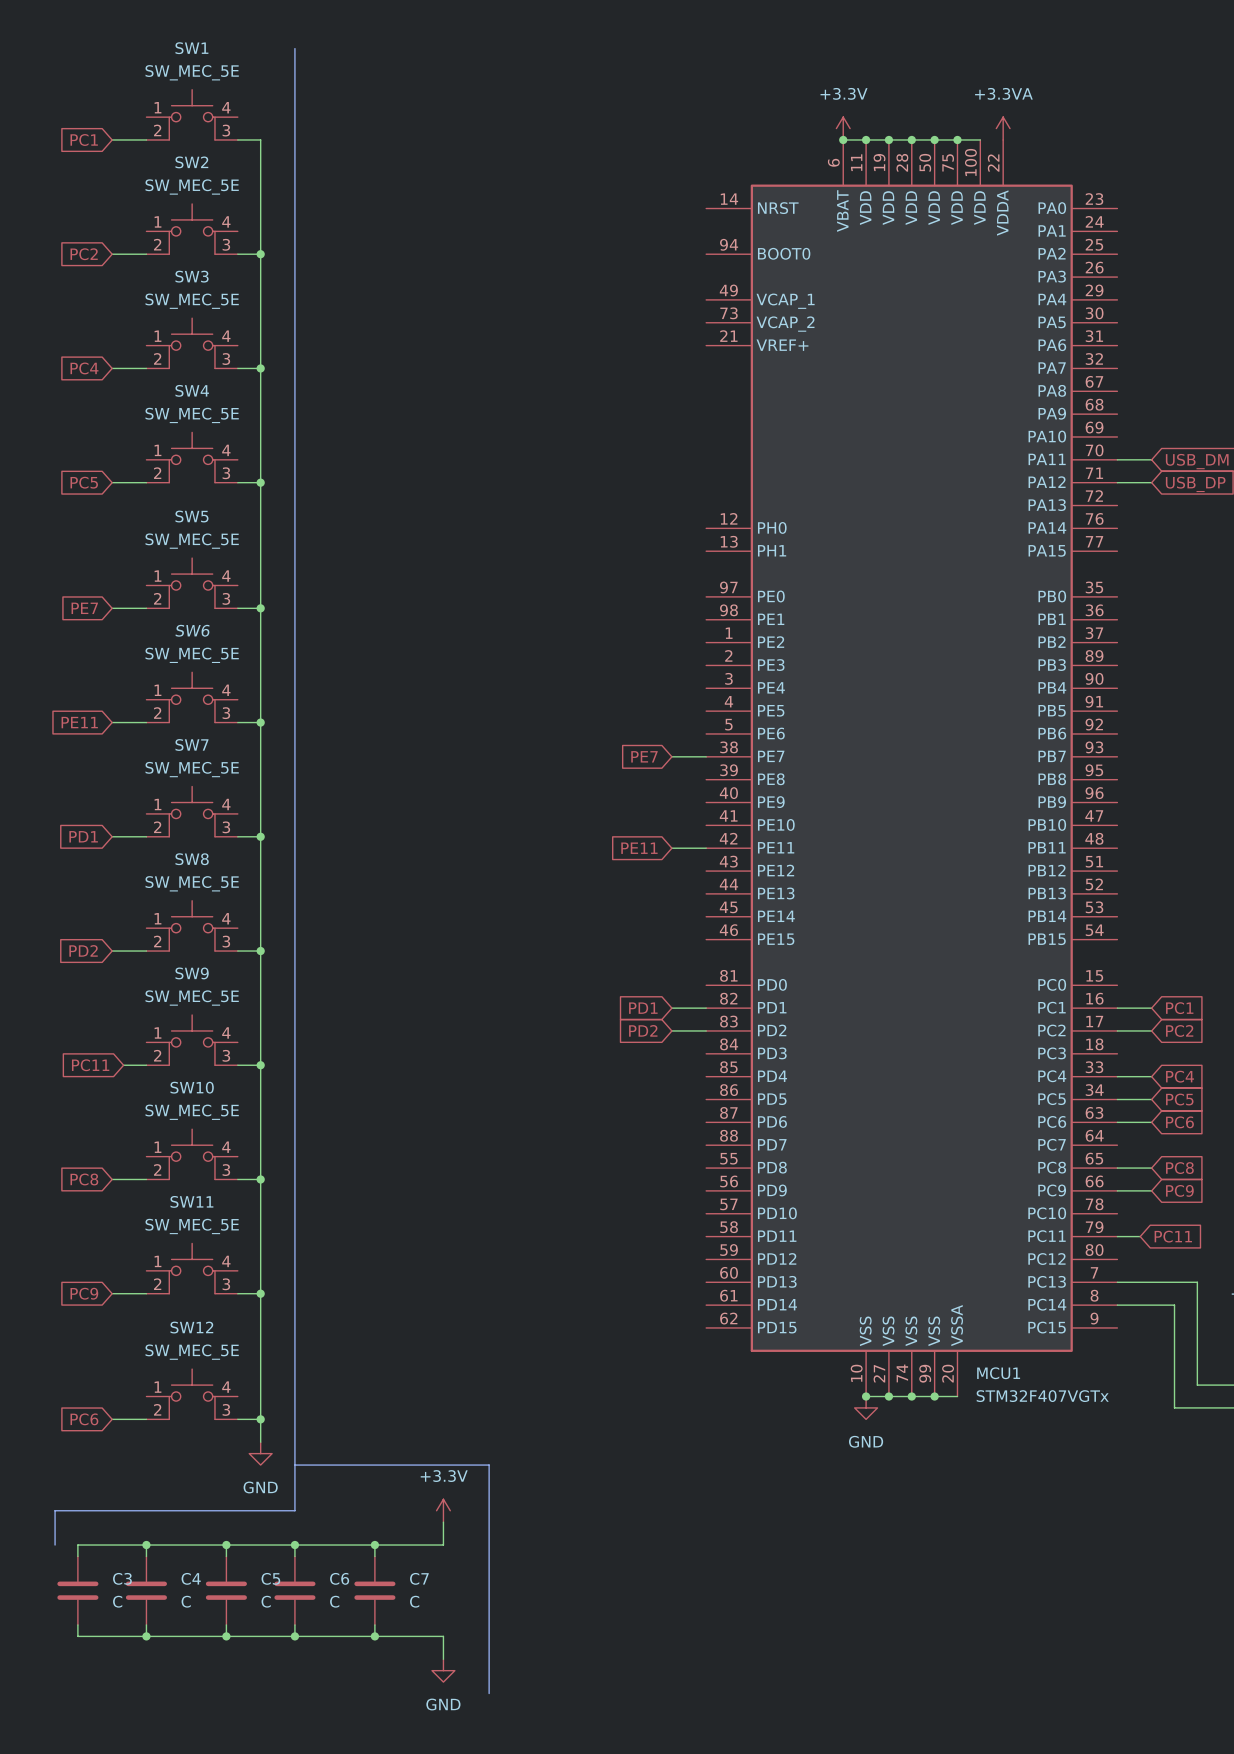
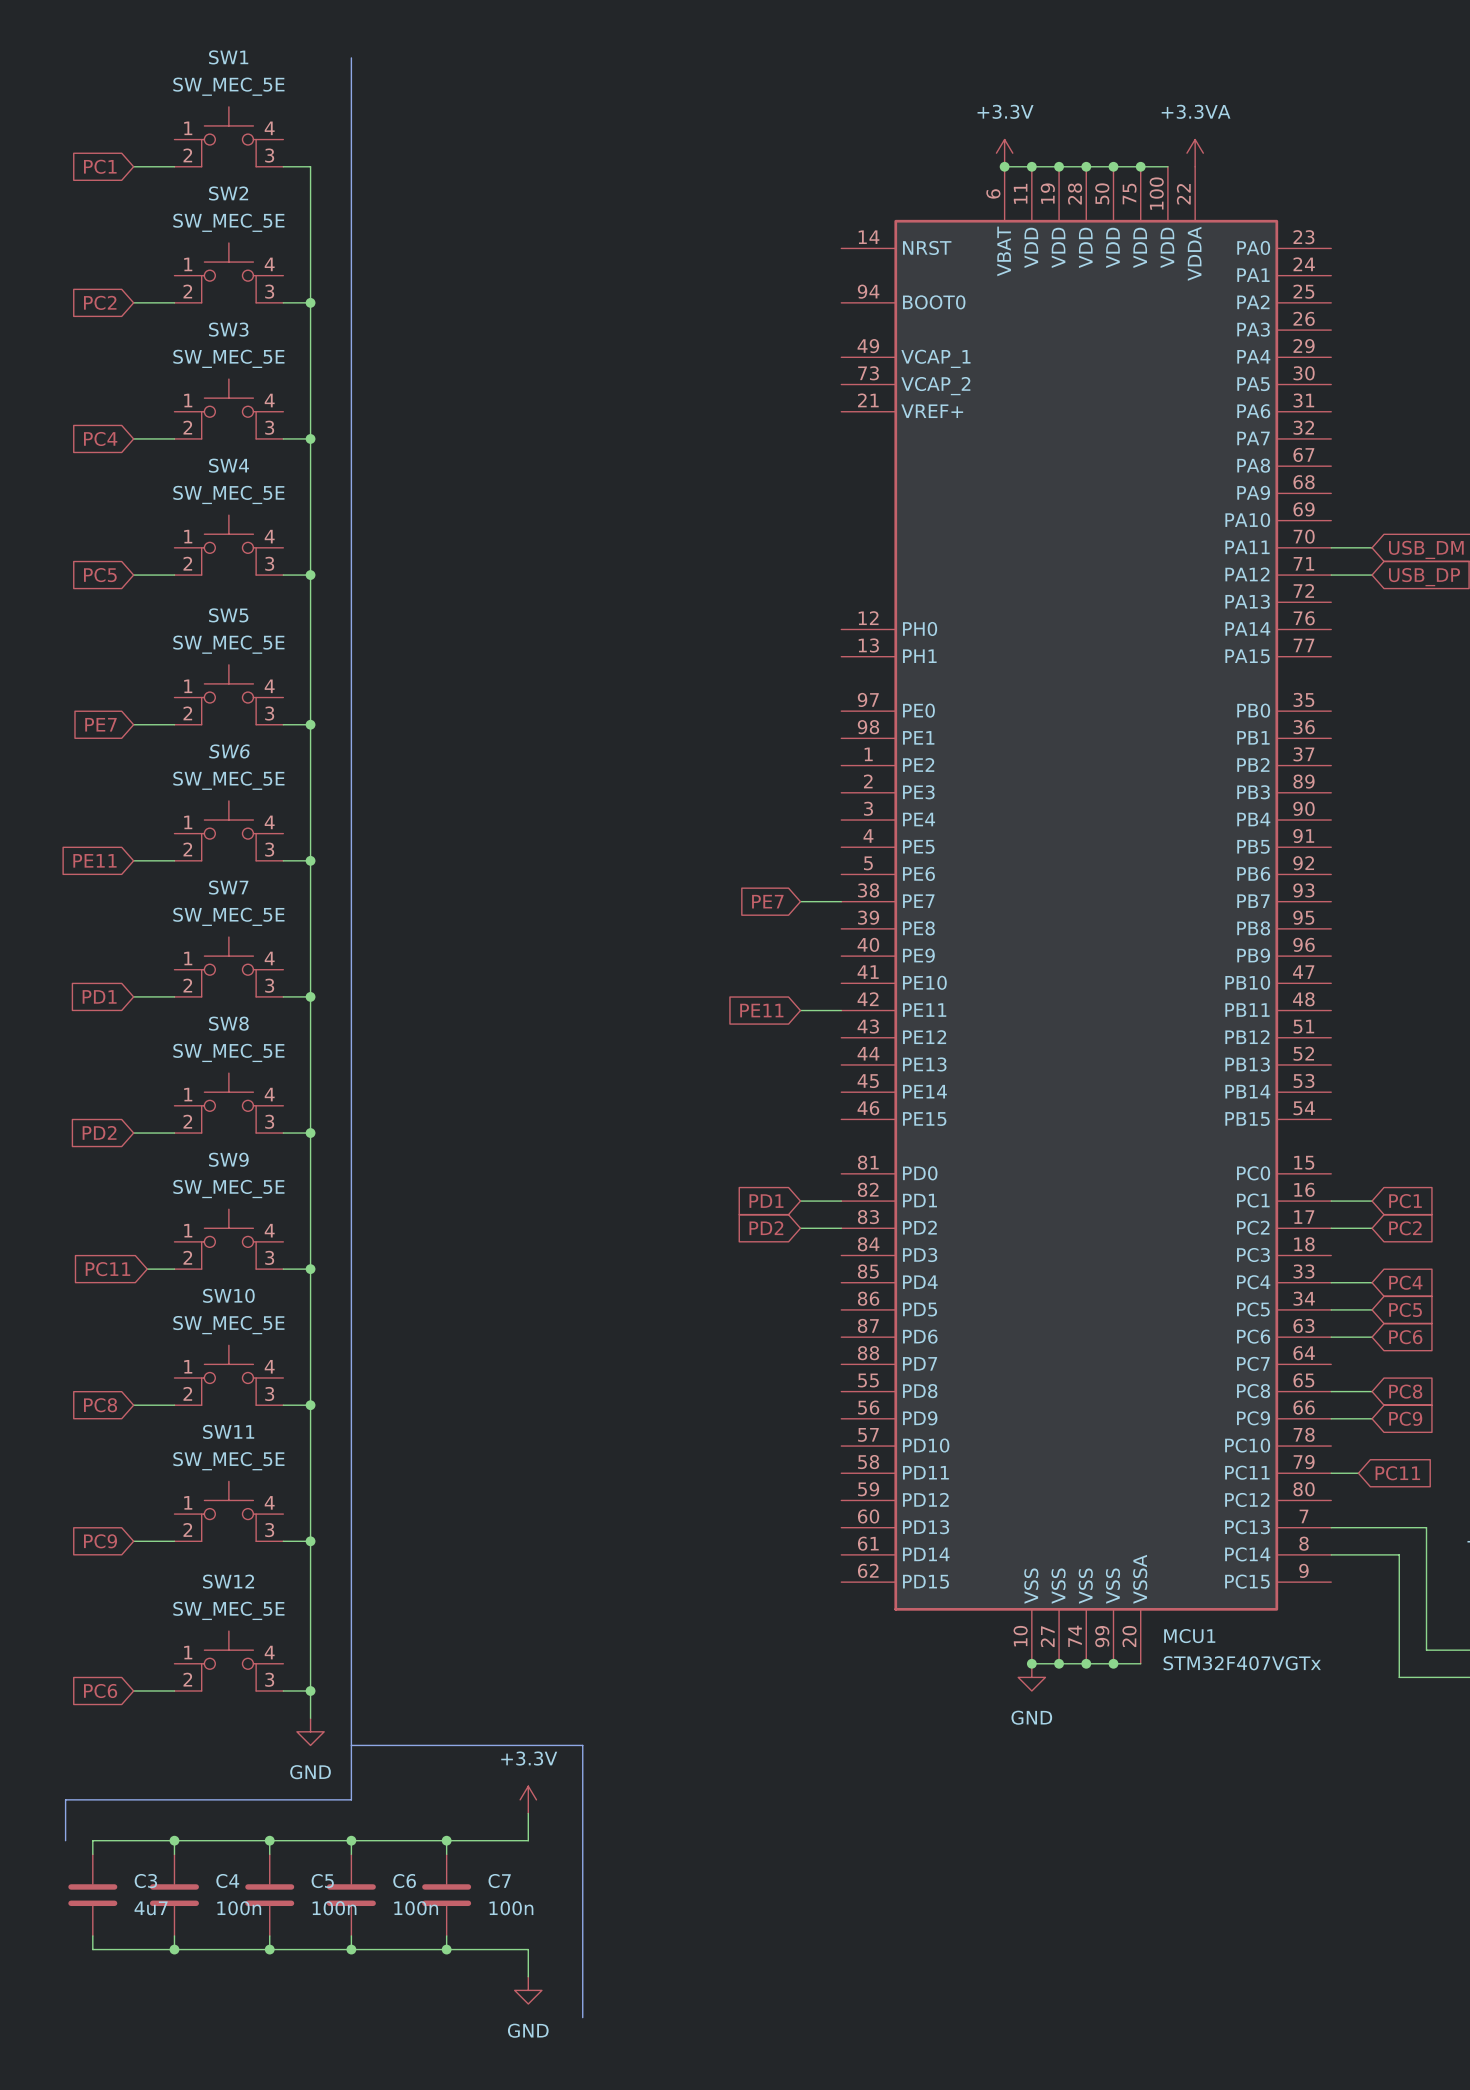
C3 value: C (117, 1601) -> 4u7 (151, 1908)
C4 value: C (186, 1601) -> 100n (239, 1908)
C5 value: C (266, 1601) -> 100n (334, 1908)
C6 value: C (334, 1601) -> 100n (416, 1908)
C7 value: C (414, 1601) -> 100n (511, 1908)

